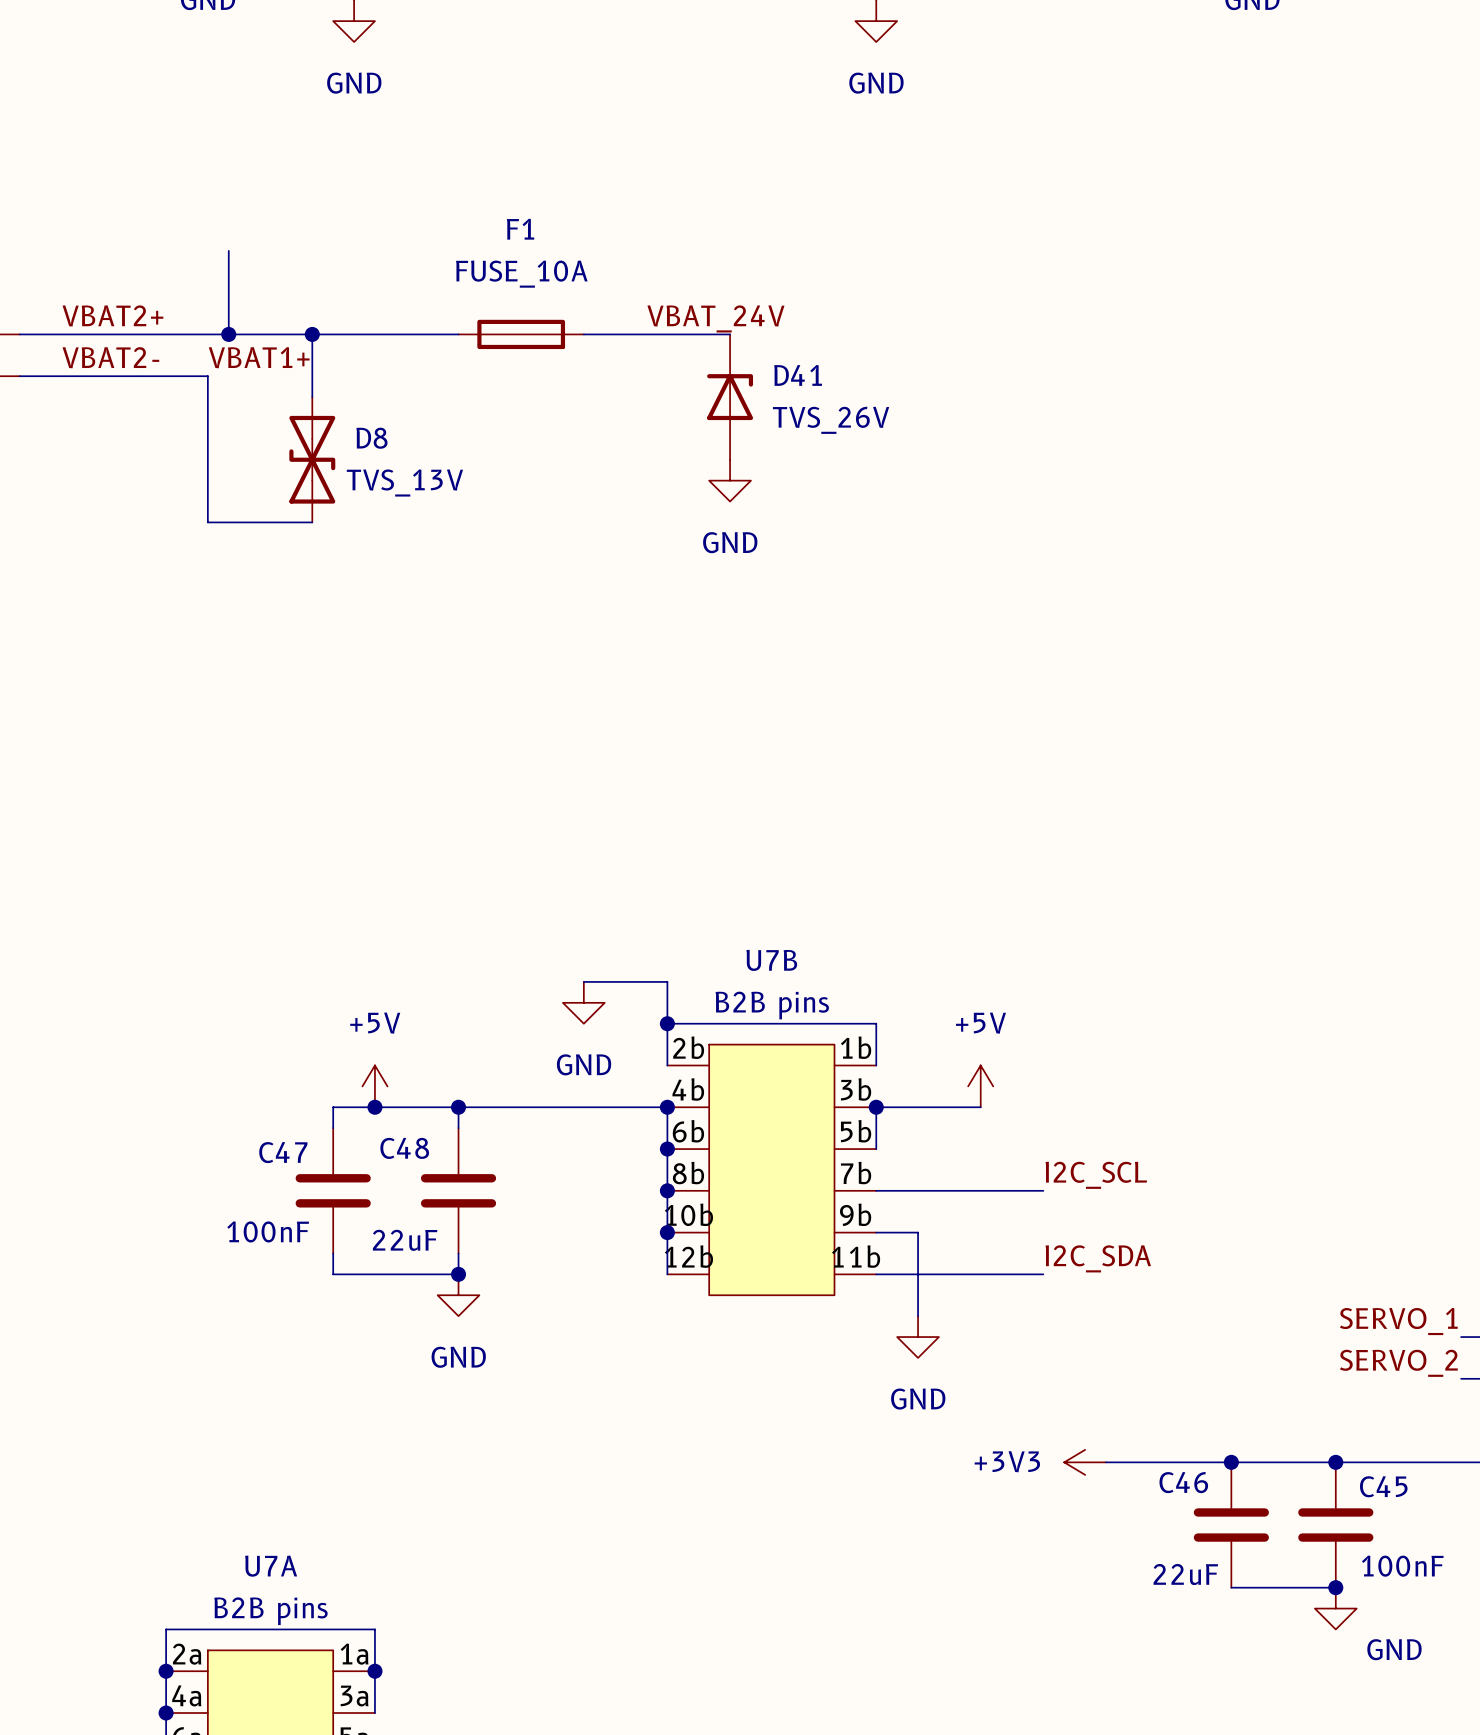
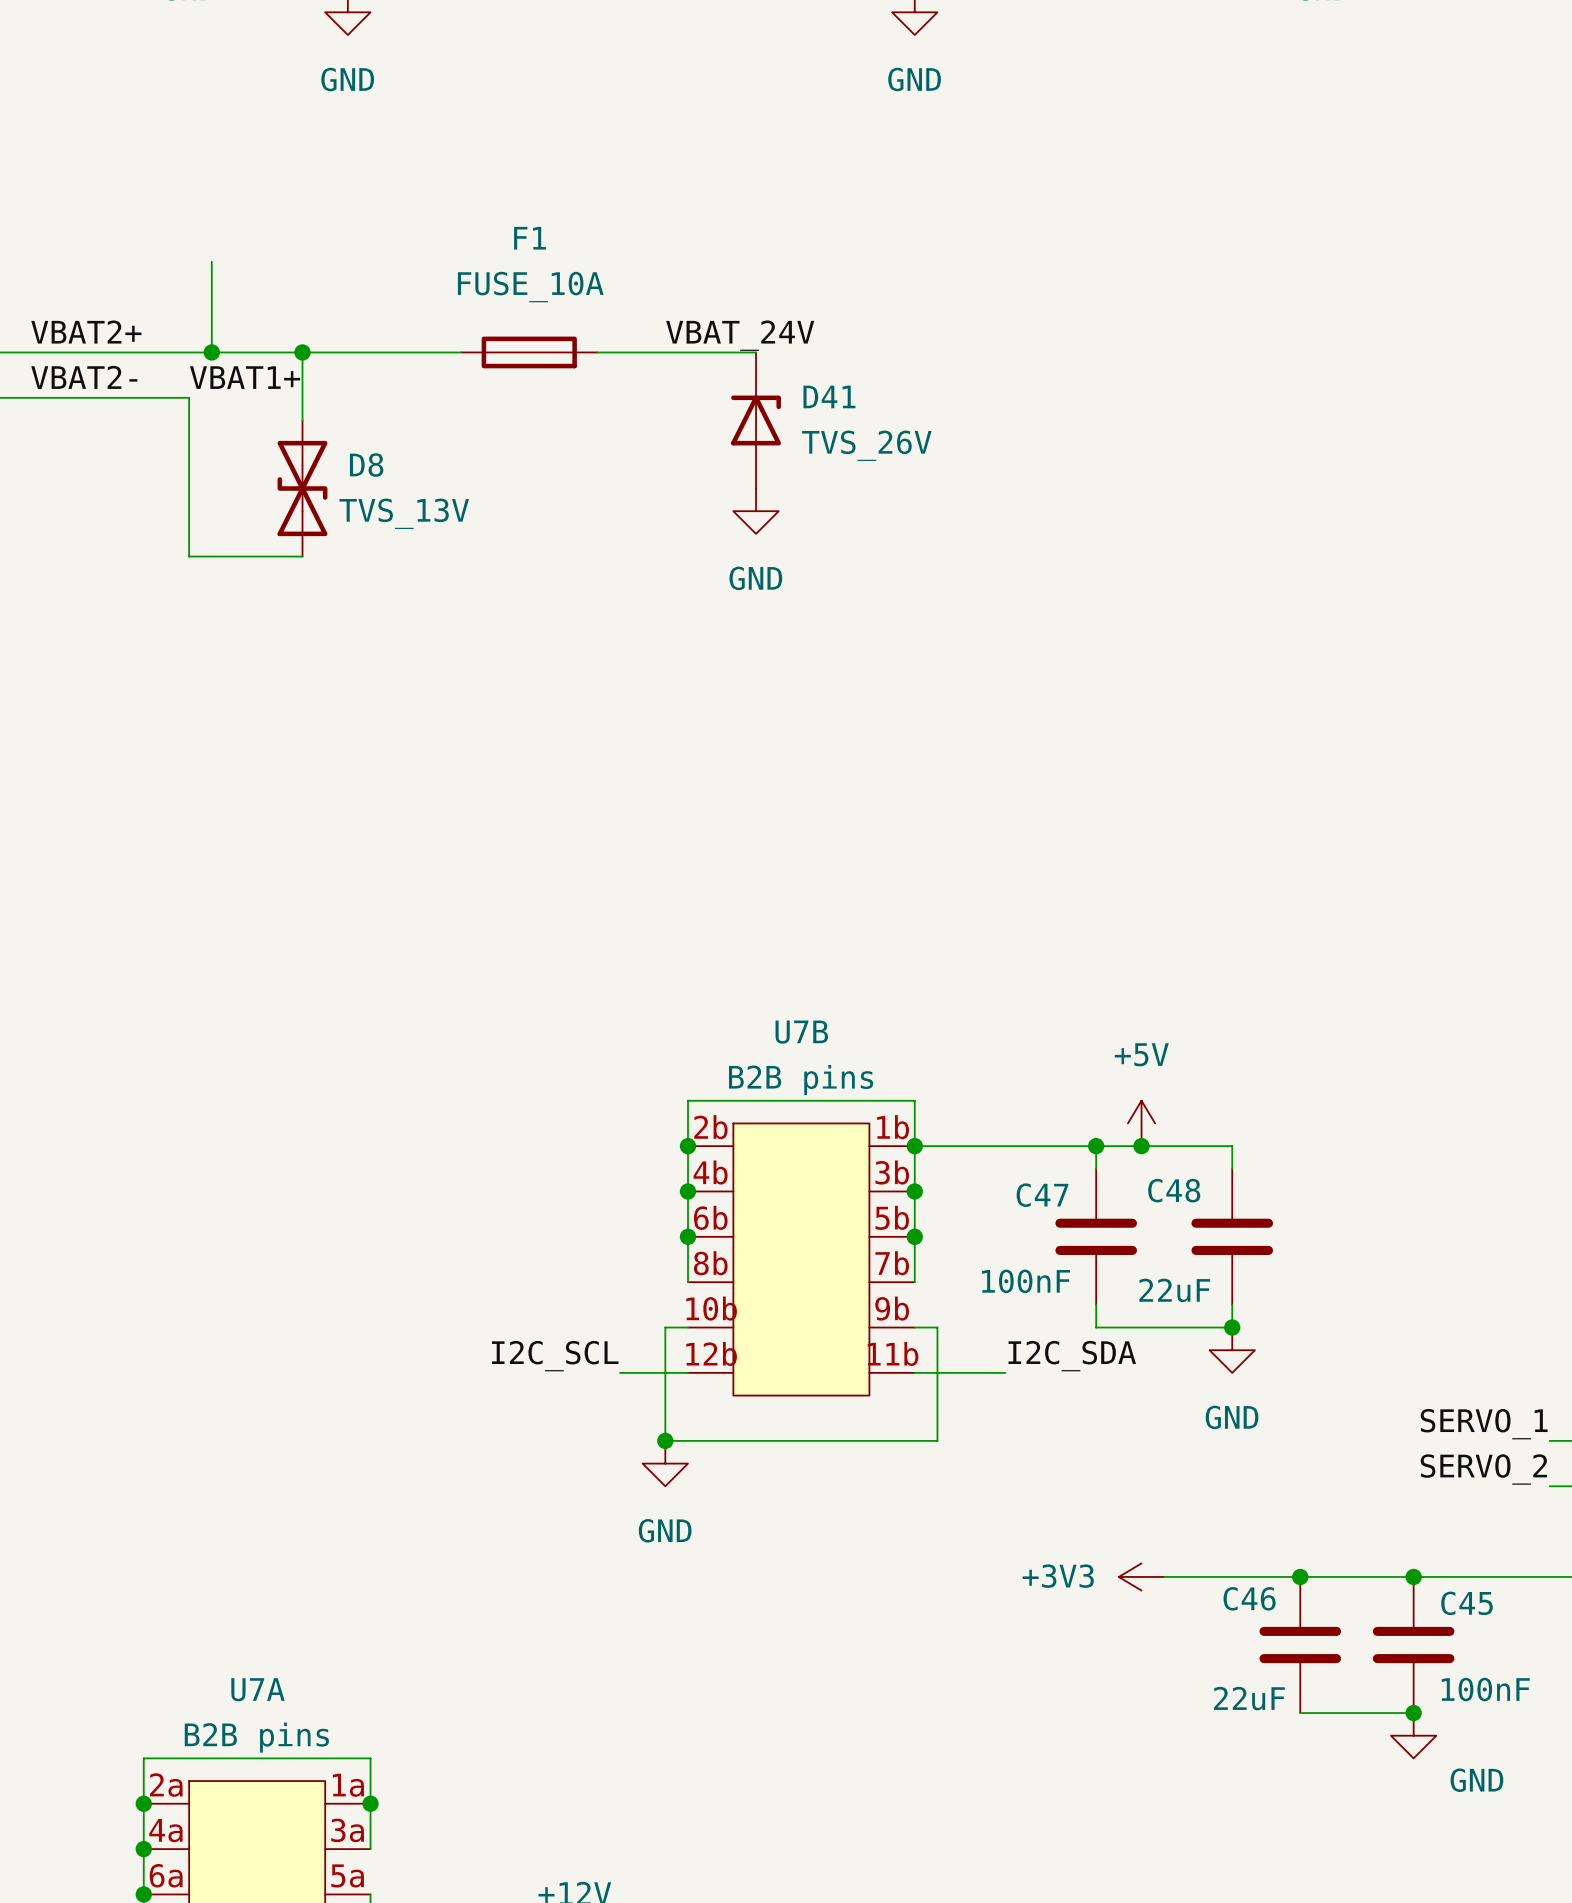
wire: (583, 981) (667, 981) (667, 1023) -> none
power symbol: GND (583, 1002) -> none
junction position: (667, 1023) -> (688, 1146)
junction: none -> (914, 1146)
wire: none -> (1096, 1146) (1096, 1168)
junction: none -> (1096, 1146)
junction: none -> (1141, 1146)
power symbol: +5V (374, 1086) -> none
power symbol position: +5V (980, 1086) -> +5V (1141, 1123)
junction: (374, 1107) -> none
wire: (458, 1107) (458, 1128) -> none
junction: (458, 1107) -> none
wire: (667, 1107) (333, 1107) (333, 1128) -> (688, 1191) (688, 1146)
wire: (876, 1107) (980, 1107) -> (914, 1191) (914, 1146) (1232, 1146) (1232, 1168)
junction: none -> (914, 1236)
label: I2C_SCL (1096, 1175) -> none
C47 position: (333, 1190) -> (1096, 1236)
C48 position: (458, 1190) -> (1232, 1236)
wire: (667, 1190) (667, 1274) -> (619, 1372) (688, 1372)
junction: (667, 1190) -> none
wire: (876, 1190) (1043, 1190) -> (914, 1282) (914, 1236)
wire: none -> (1096, 1304) (1096, 1327) (1232, 1327) (1232, 1304)
junction: (667, 1232) -> none
wire: (897, 1232) (918, 1232) (918, 1316) -> (937, 1327) (937, 1440) (665, 1440) (665, 1327) (688, 1327)
junction: none -> (1232, 1327)
wire: (333, 1253) (333, 1274) (458, 1274) (458, 1253) -> none
power symbol: none -> GND (1232, 1350)
label: none -> I2C_SCL (555, 1356)
label position: I2C_SDA (1098, 1258) -> I2C_SDA (1072, 1356)
junction: (458, 1274) -> none
wire: (959, 1274) (1043, 1274) -> none
power symbol: GND (458, 1295) -> none
junction: none -> (665, 1440)
power symbol: GND (918, 1337) -> none
power symbol: none -> GND (665, 1463)

